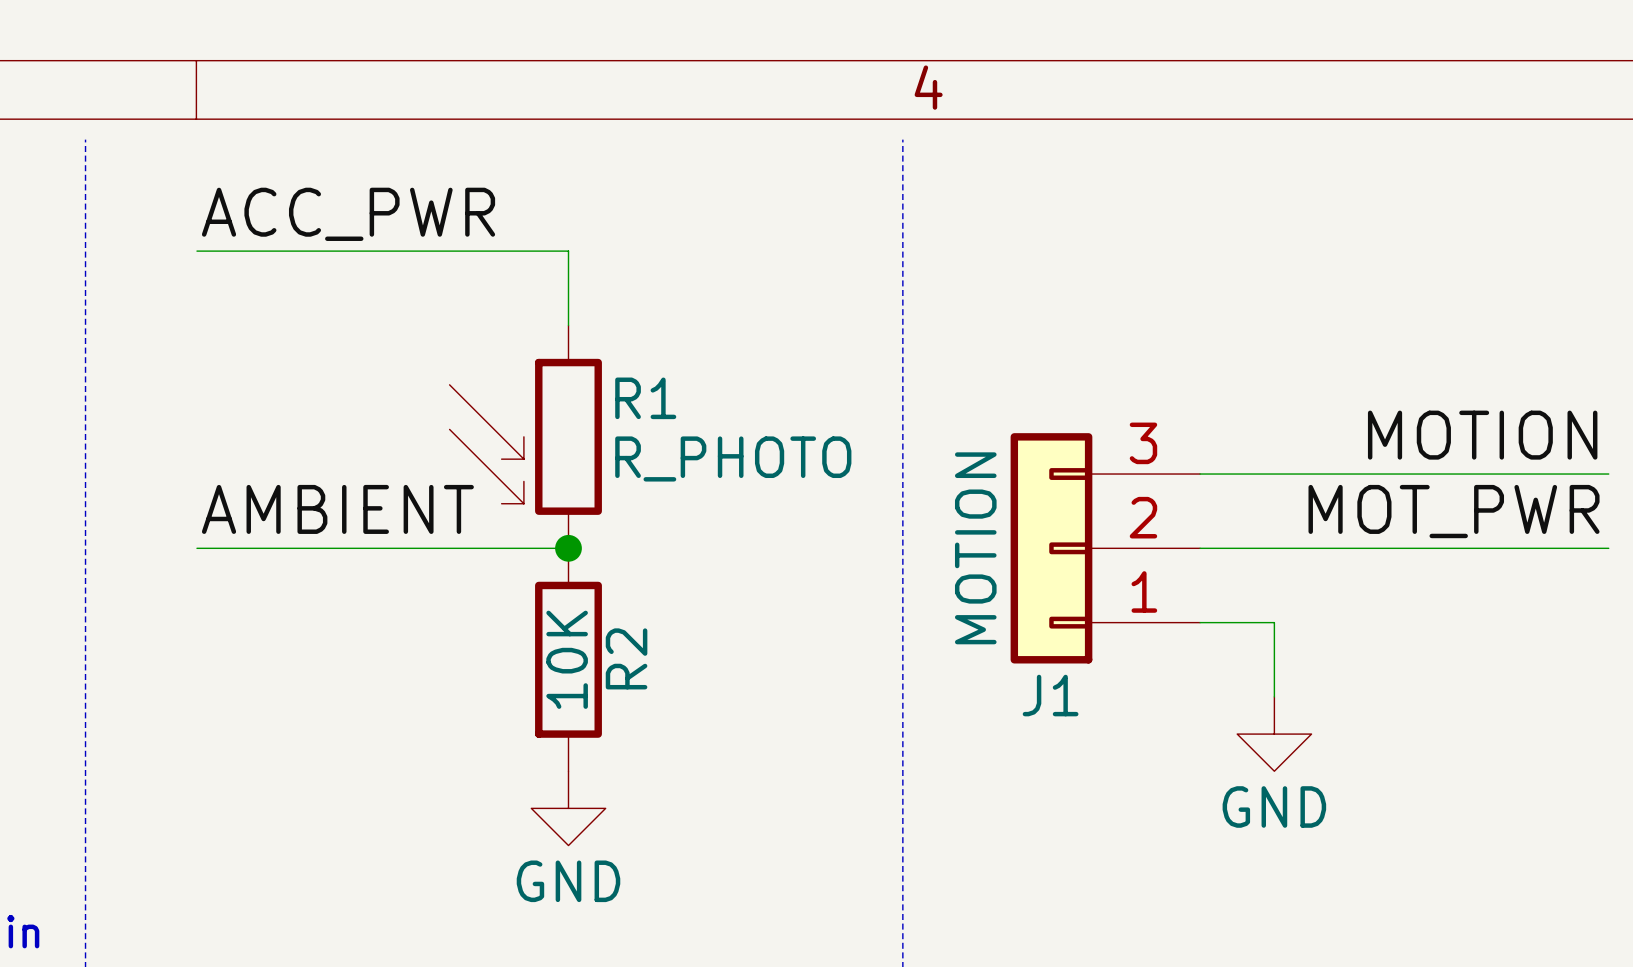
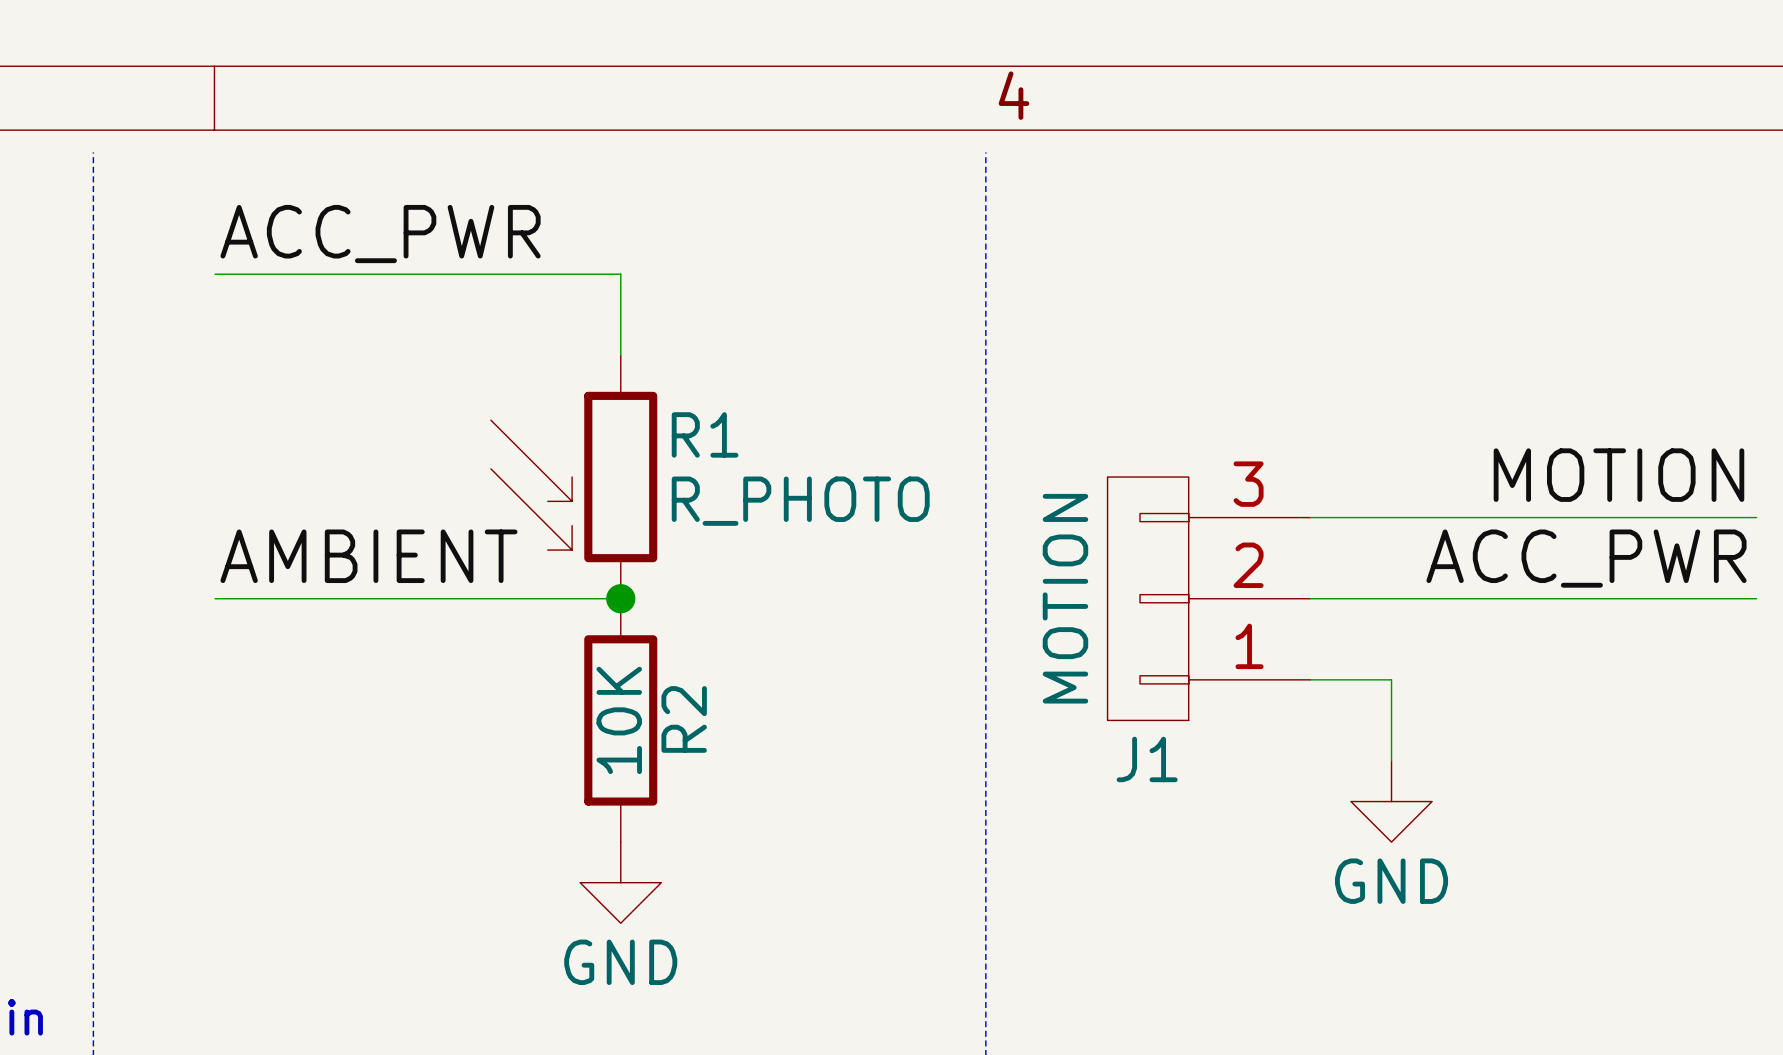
J1 symbol: [1010, 433, 1201, 664] -> [1107, 477, 1311, 721]
label: MOT_PWR (1454, 511) -> ACC_PWR (1586, 558)

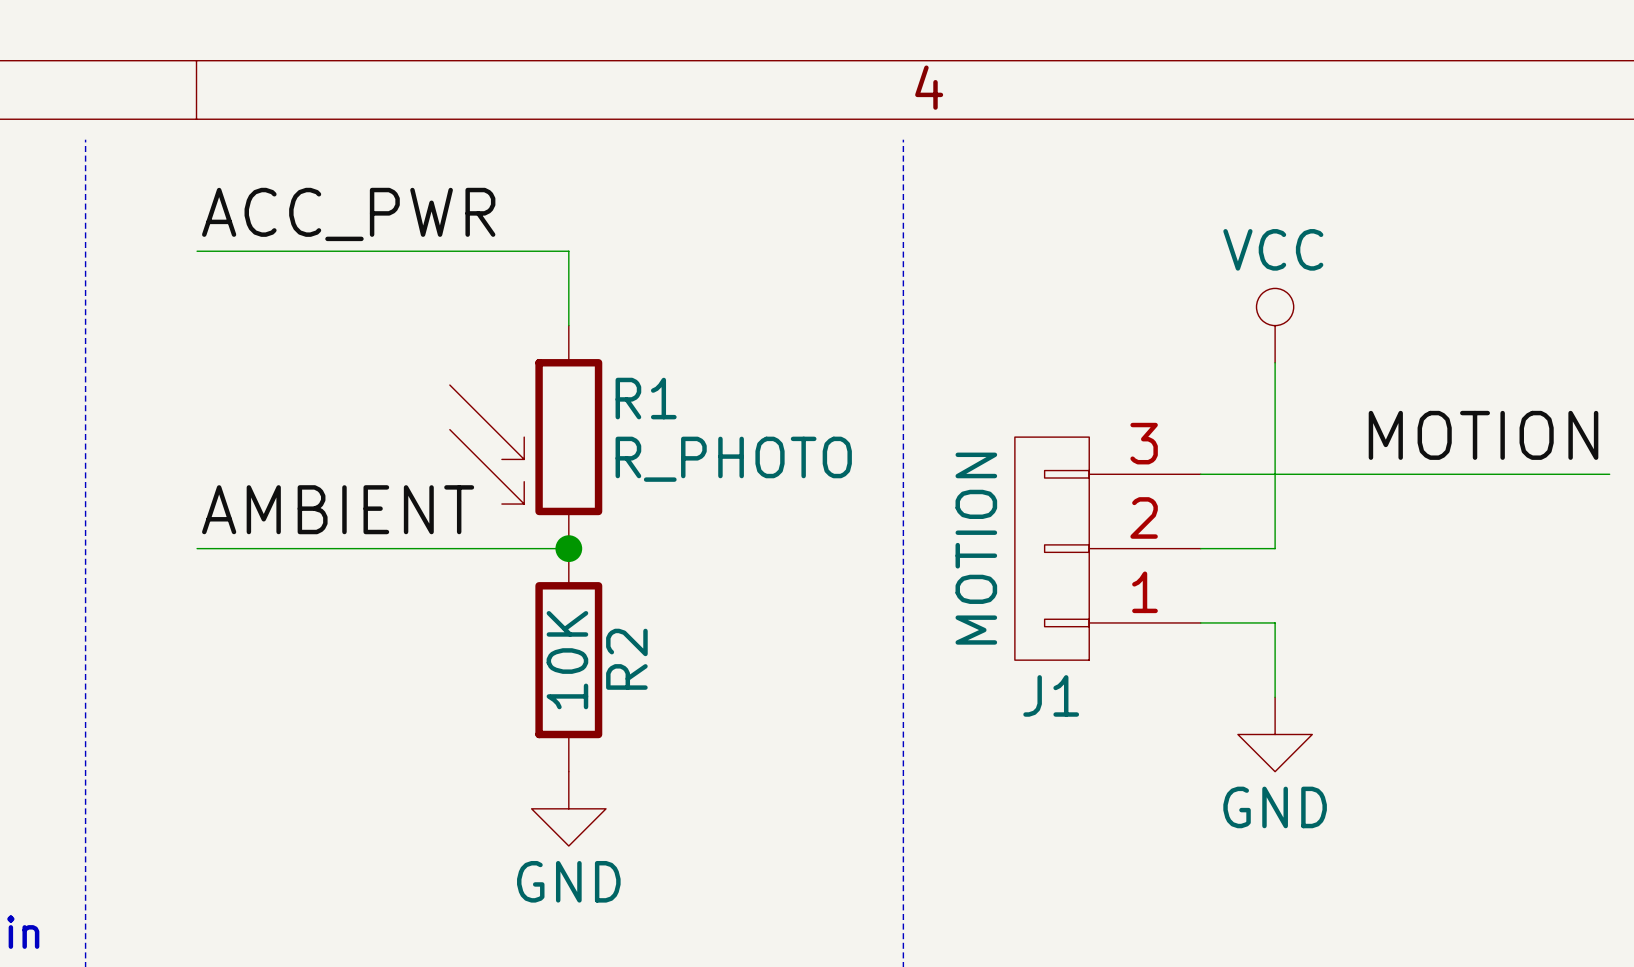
power symbol: none -> VCC (1275, 325)
label: ACC_PWR (1586, 558) -> none
wire: (1391, 598) (1756, 598) -> (1275, 548) (1275, 362)

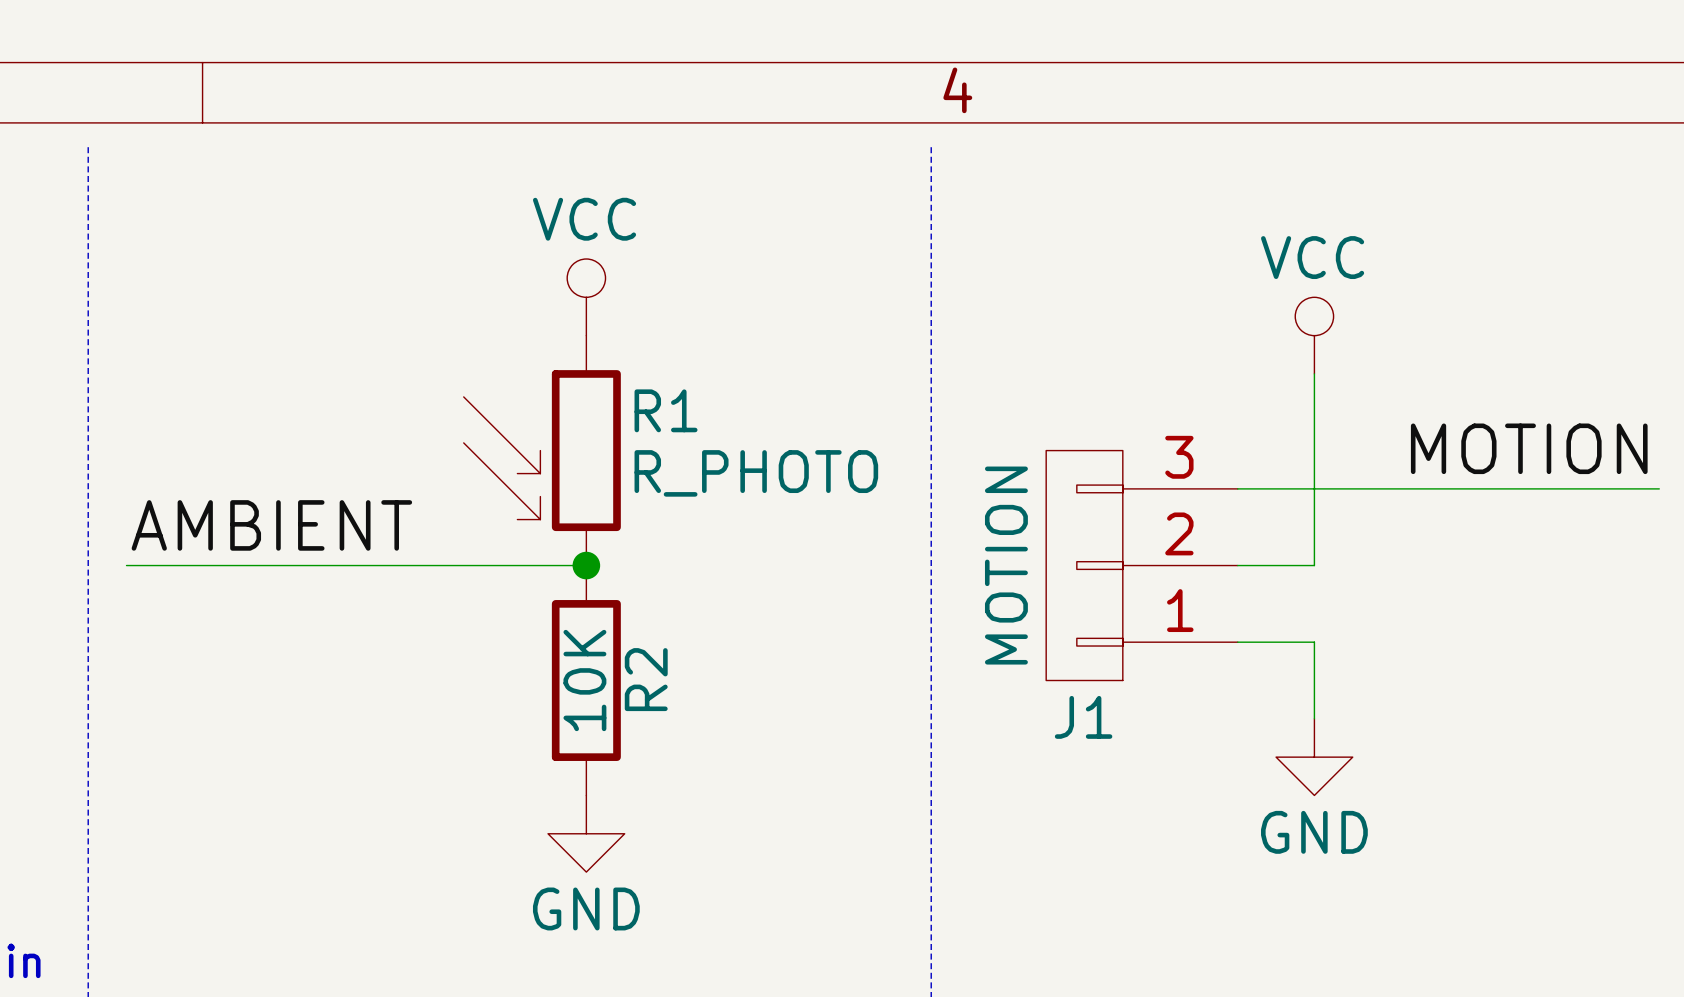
label: ACC_PWR (348, 214) -> none
wire: (197, 251) (568, 251) (568, 325) -> none
power symbol: none -> VCC (586, 297)
label position: AMBIENT (338, 509) -> AMBIENT (271, 525)
wire: none -> (126, 565) (203, 565)

